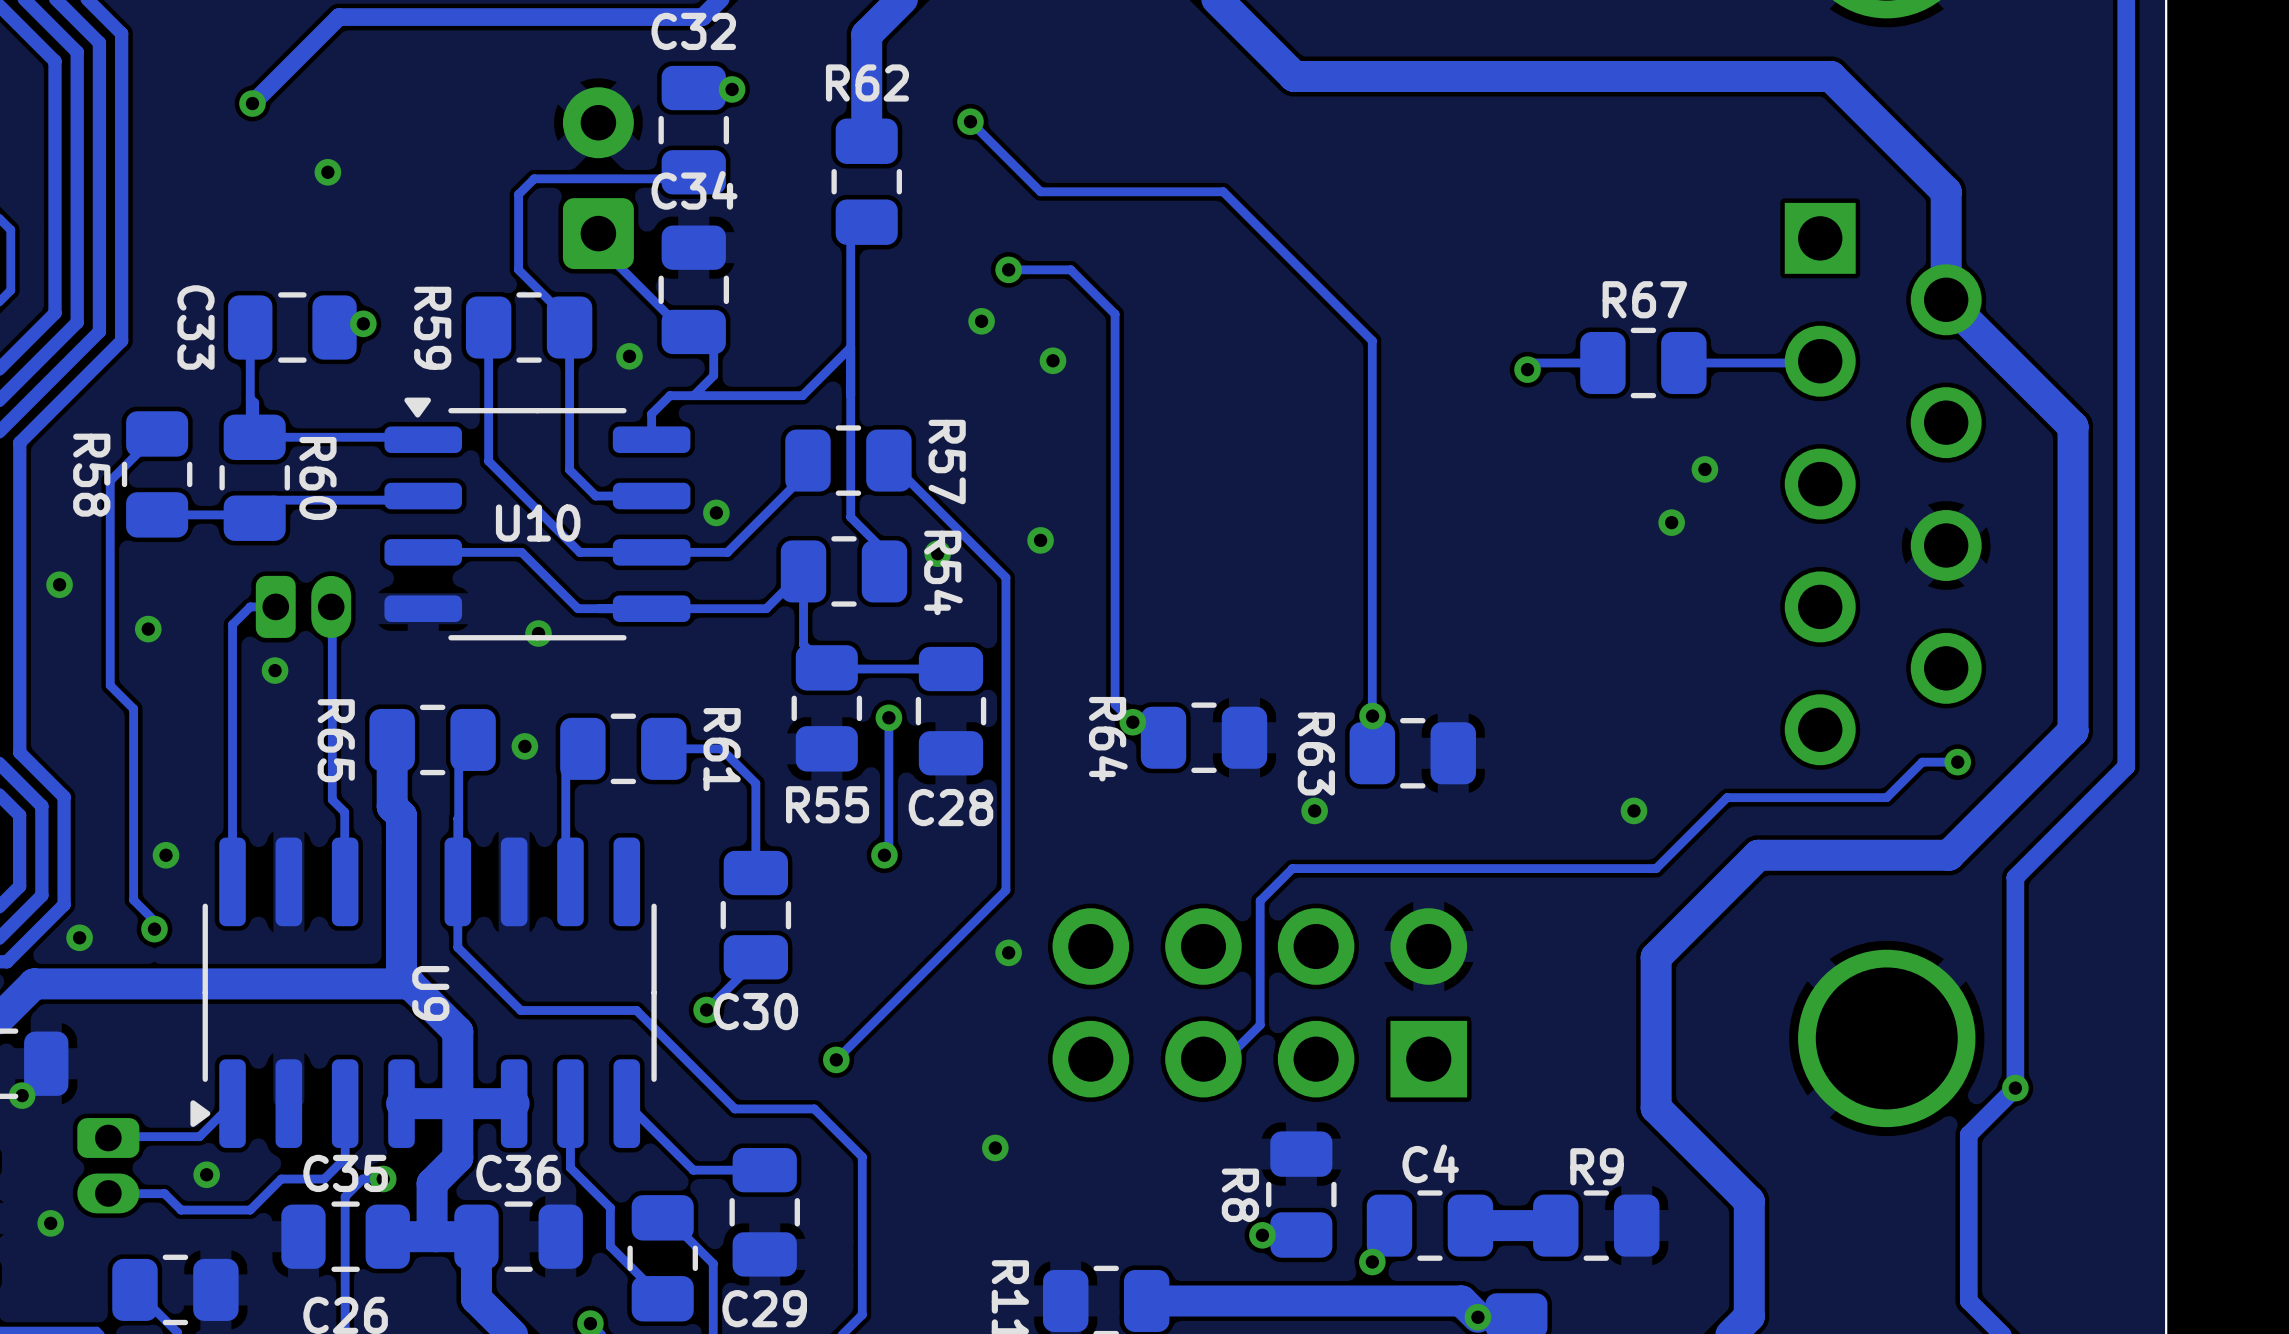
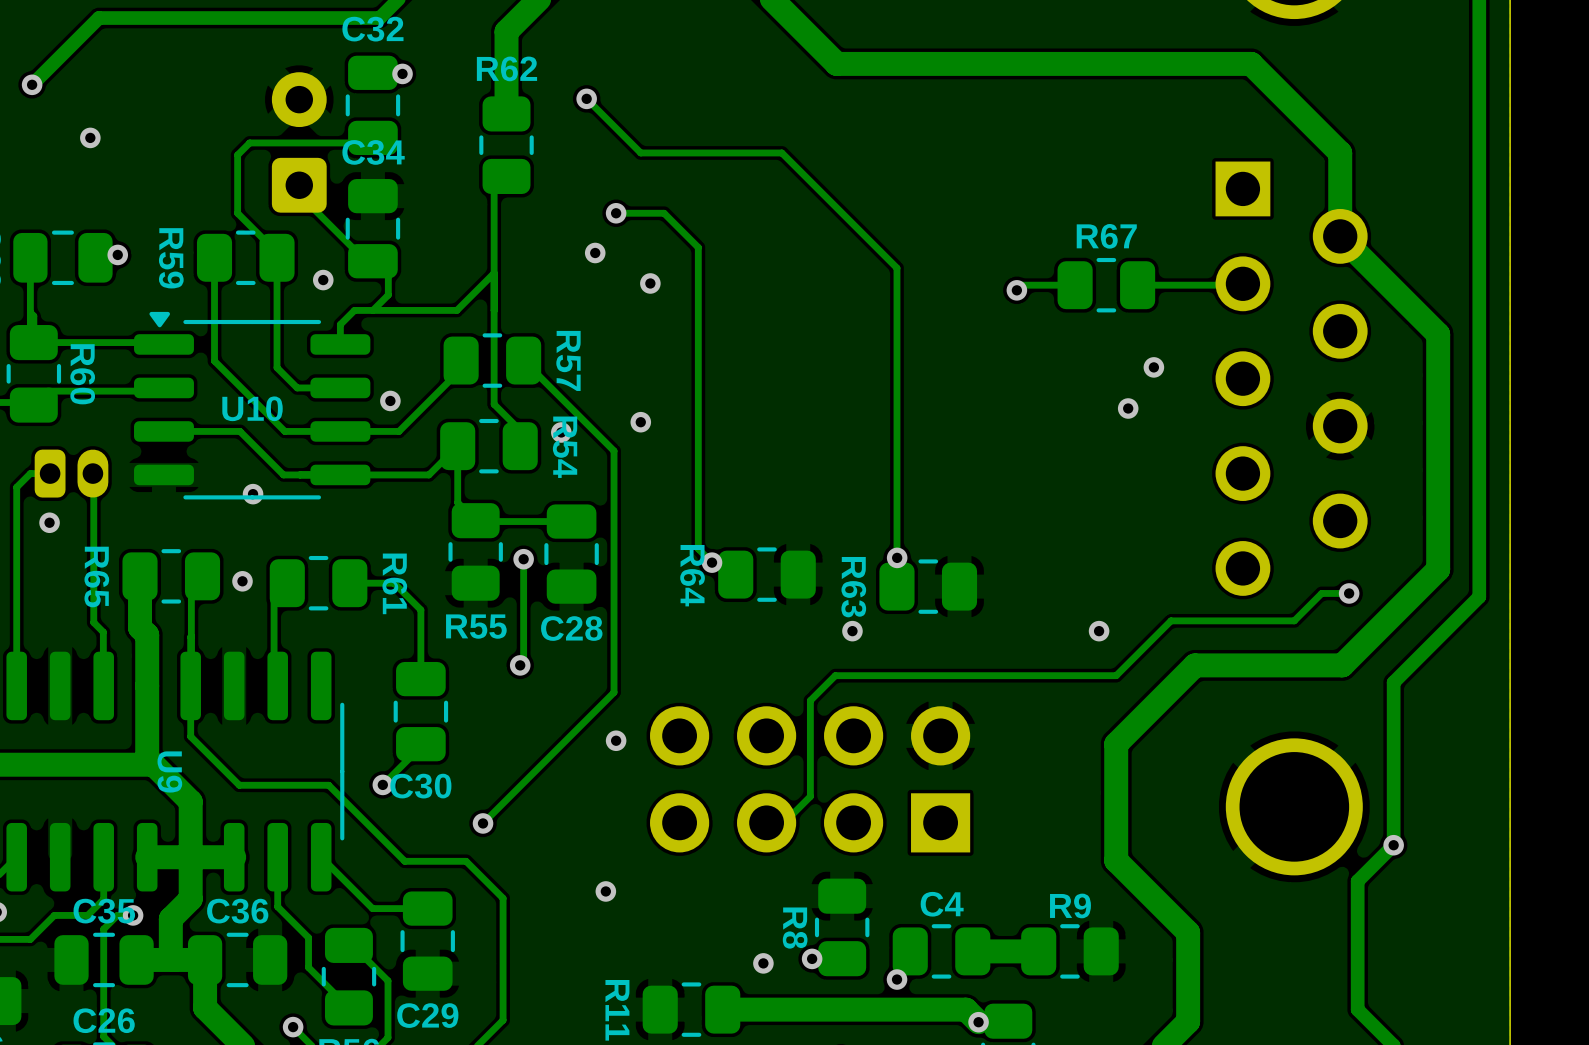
via: none -> (763, 963)

